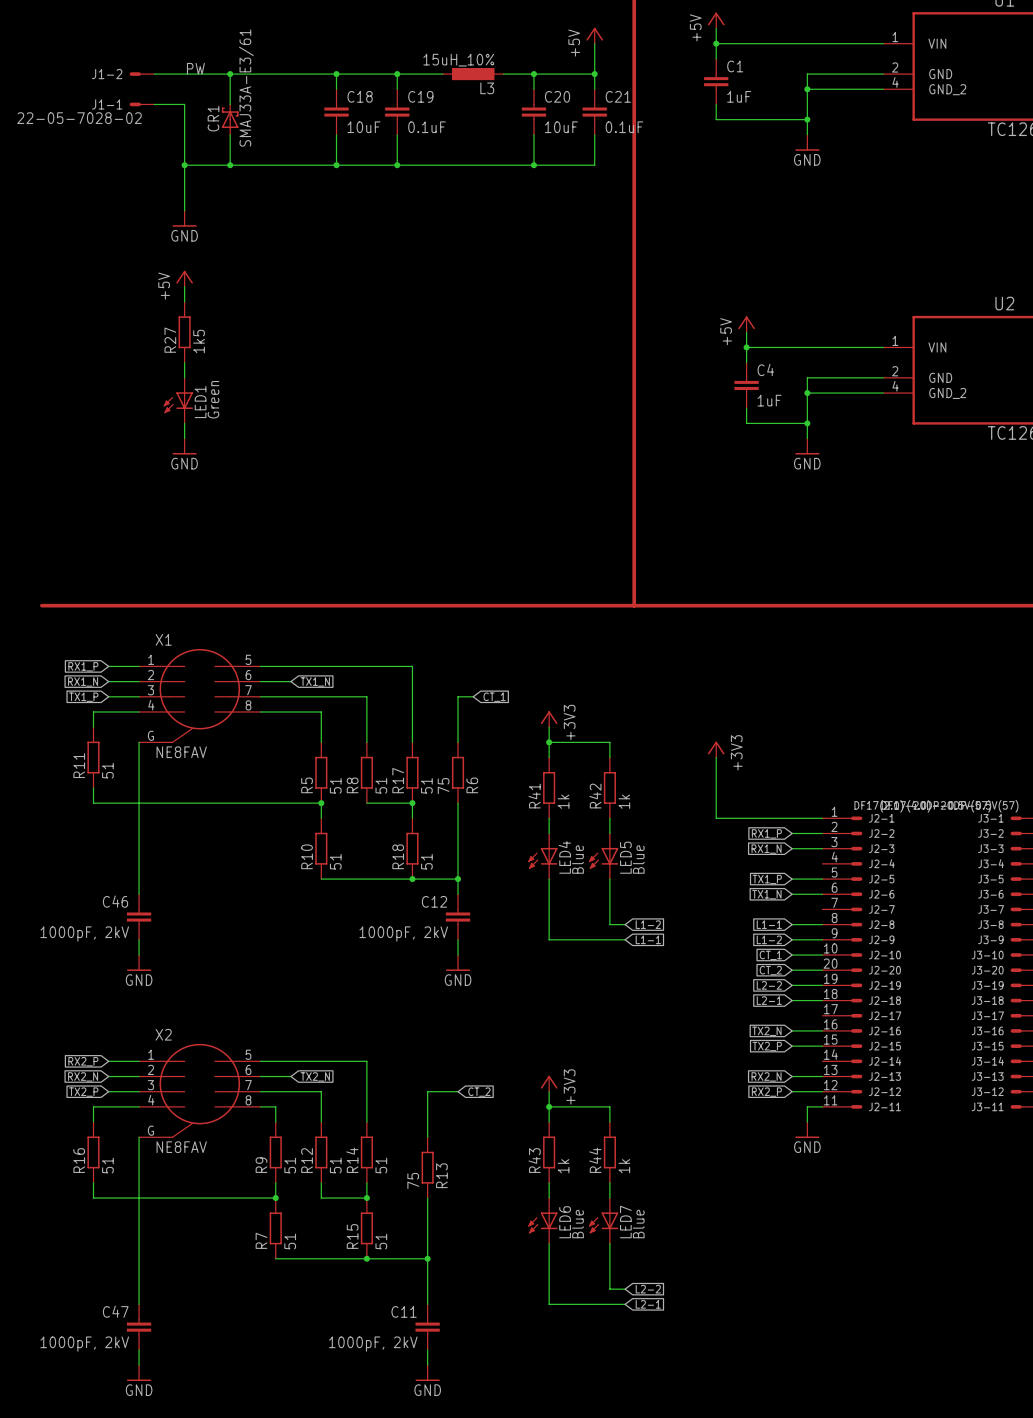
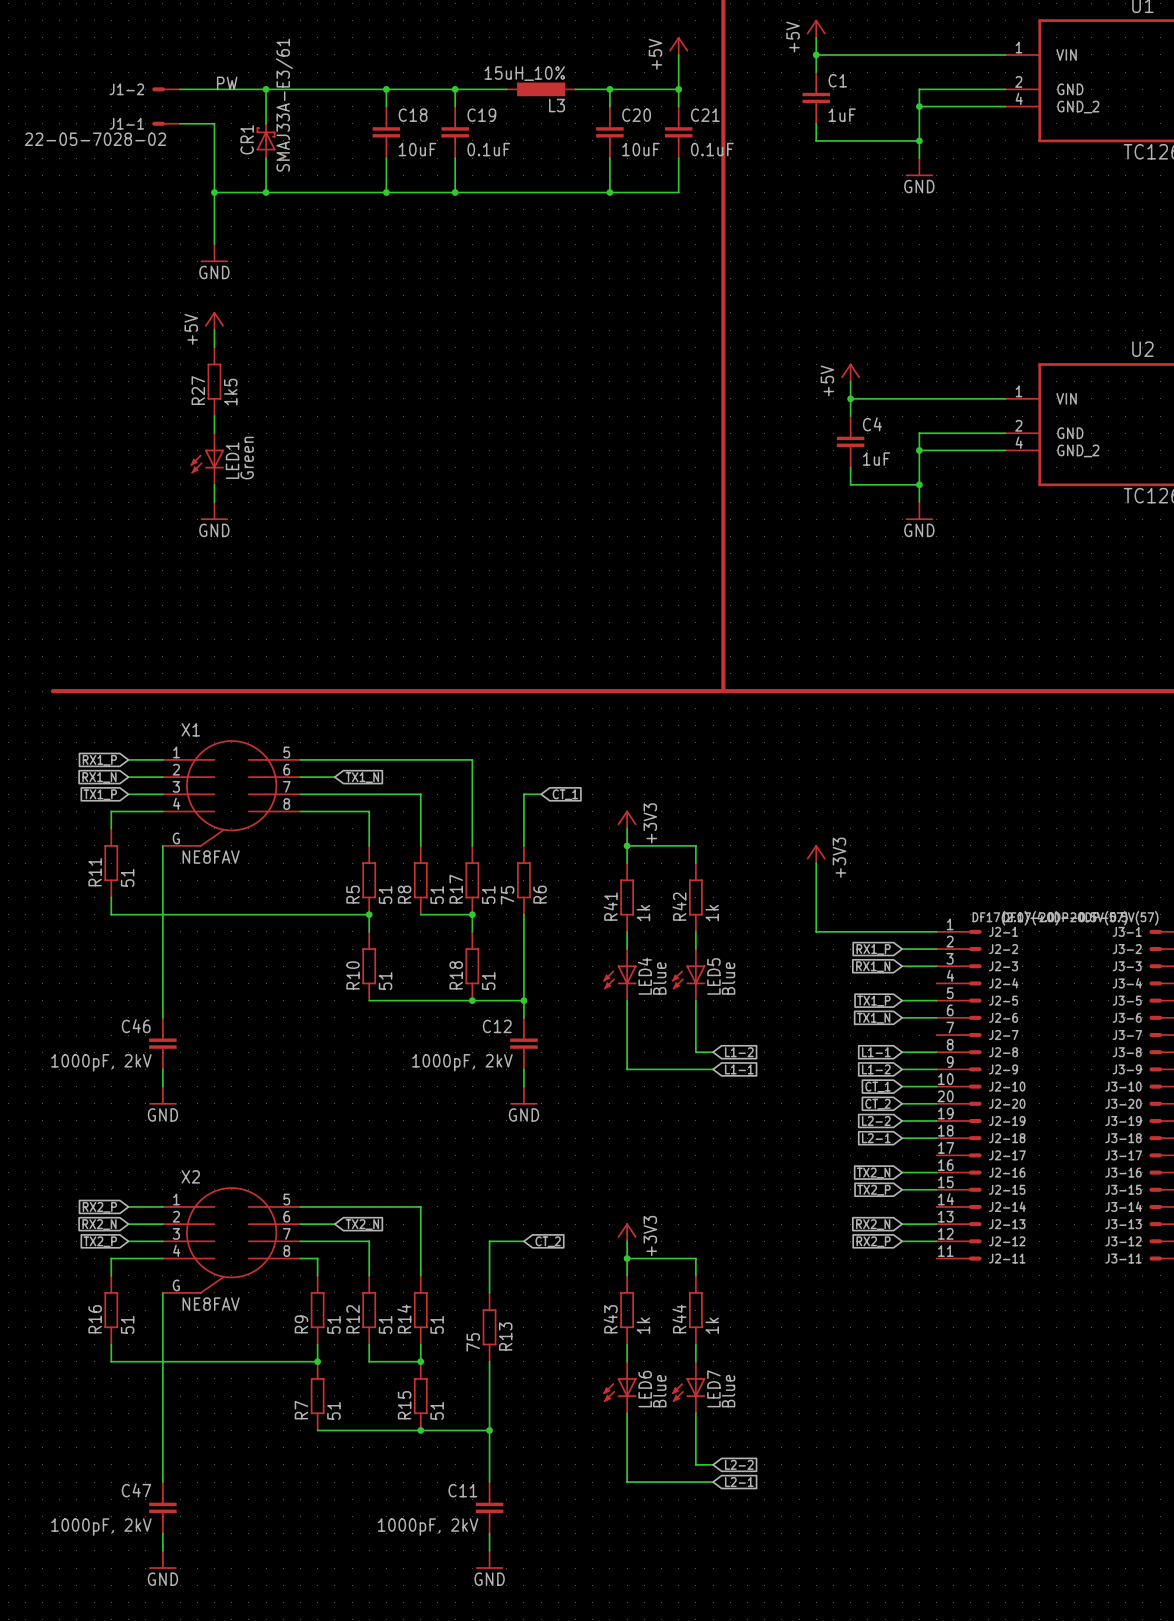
wire: (822, 1106) (807, 1106) (807, 1122) -> none
power symbol: GND (807, 1130) -> none

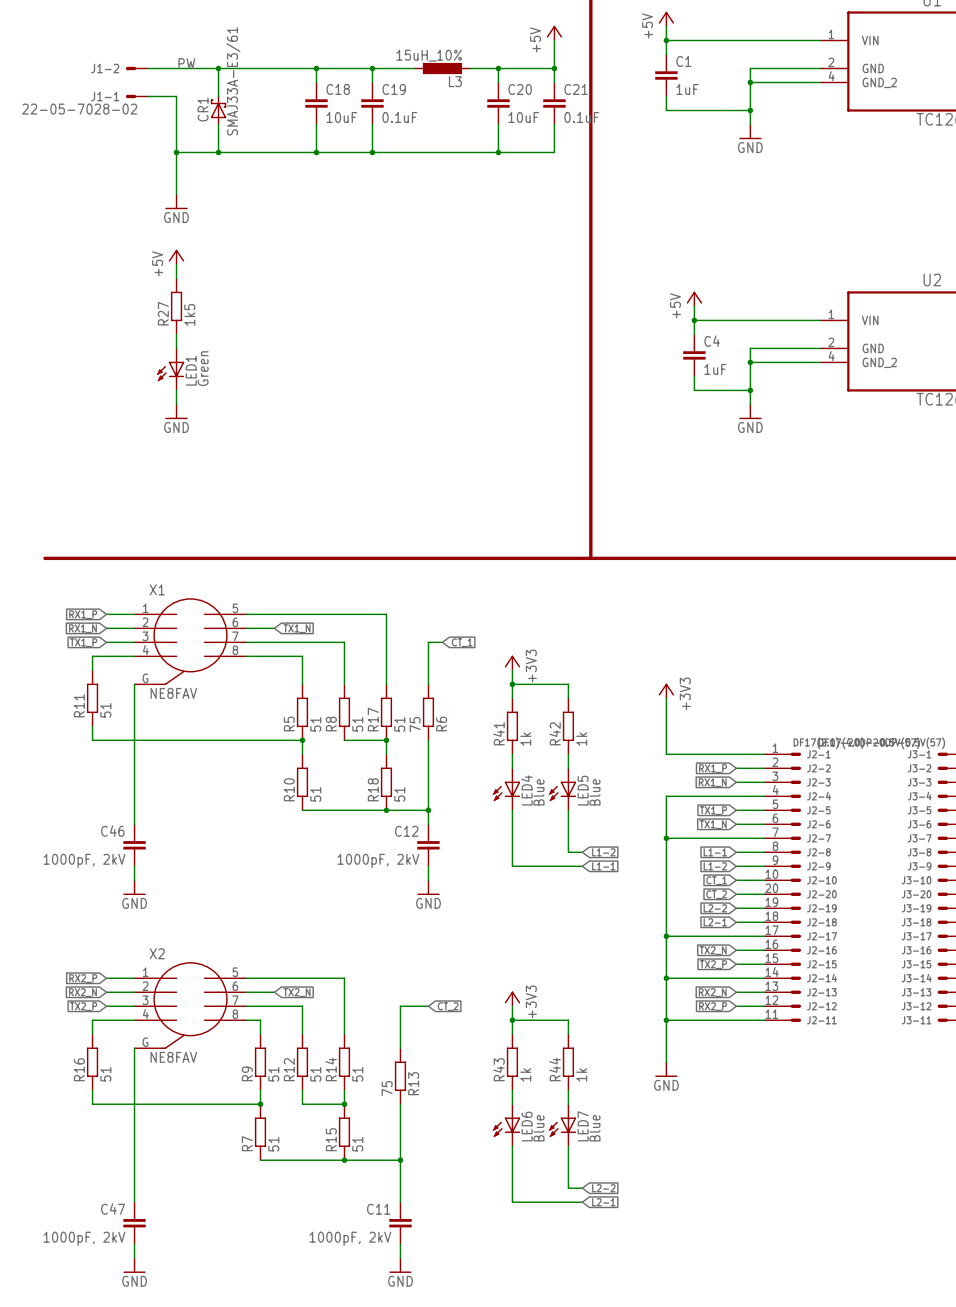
wire: none -> (764, 796) (666, 796) (666, 1062)
wire: none -> (666, 838) (764, 838)
junction: none -> (666, 838)
wire: none -> (666, 936) (764, 936)
junction: none -> (666, 936)
wire: none -> (666, 978) (764, 978)
junction: none -> (666, 978)
wire: none -> (666, 1020) (764, 1020)
junction: none -> (666, 1020)
power symbol: none -> GND (666, 1069)

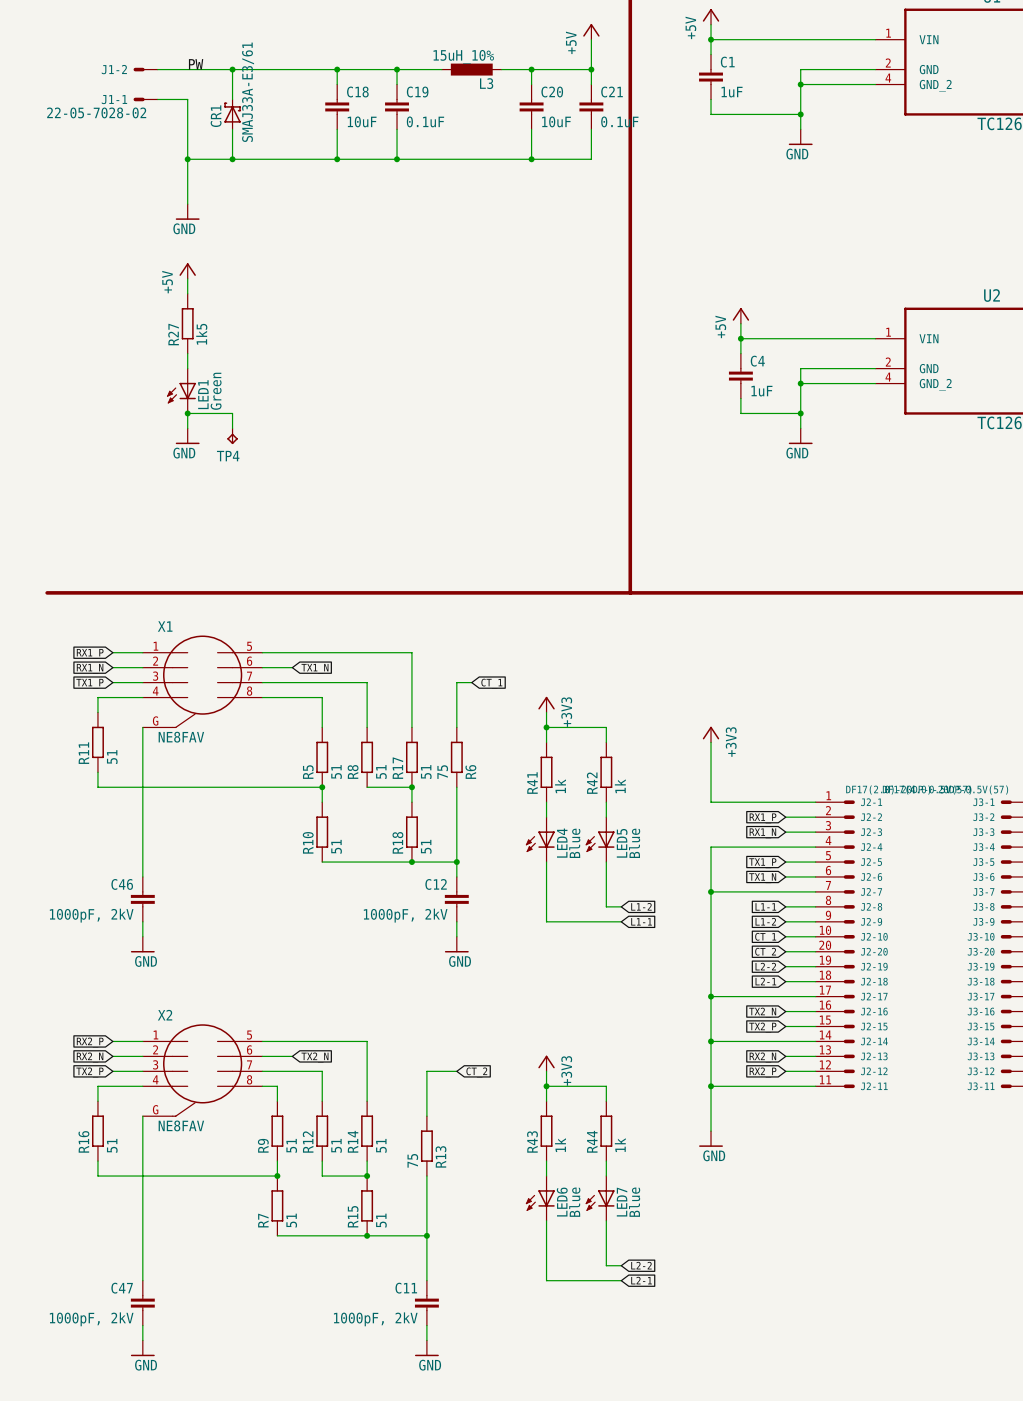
wire: none -> (187, 413) (232, 413) (232, 428)
junction: none -> (187, 413)
TP4: none -> (232, 436)

